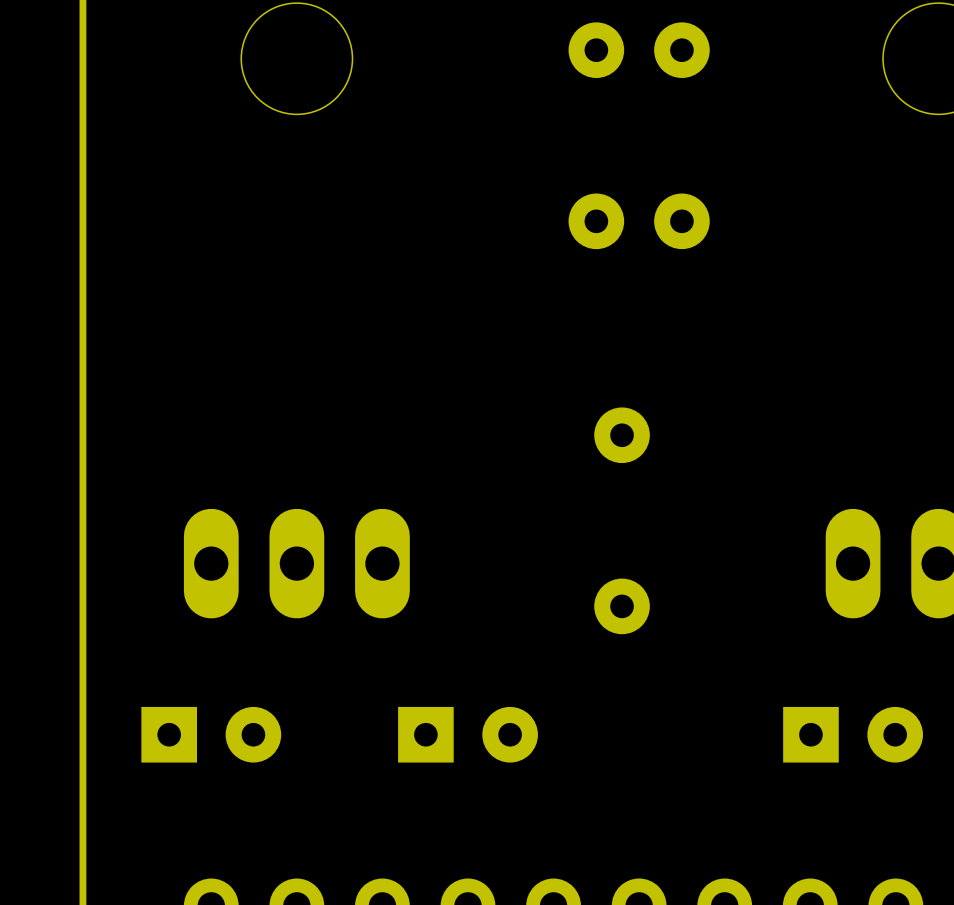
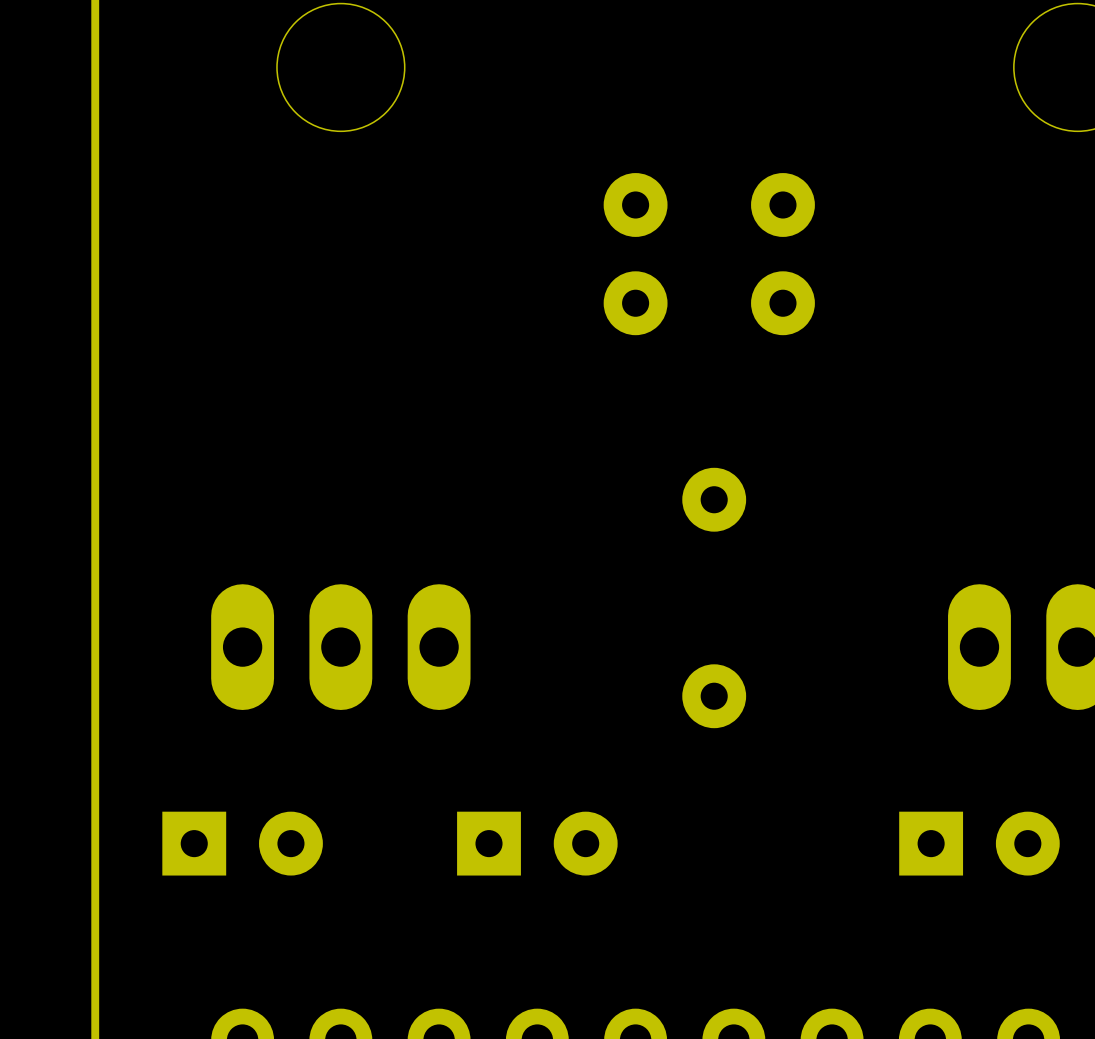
part: (639, 50) -> none
part: none -> (635, 254)
part: (639, 221) -> none
part: none -> (782, 254)

